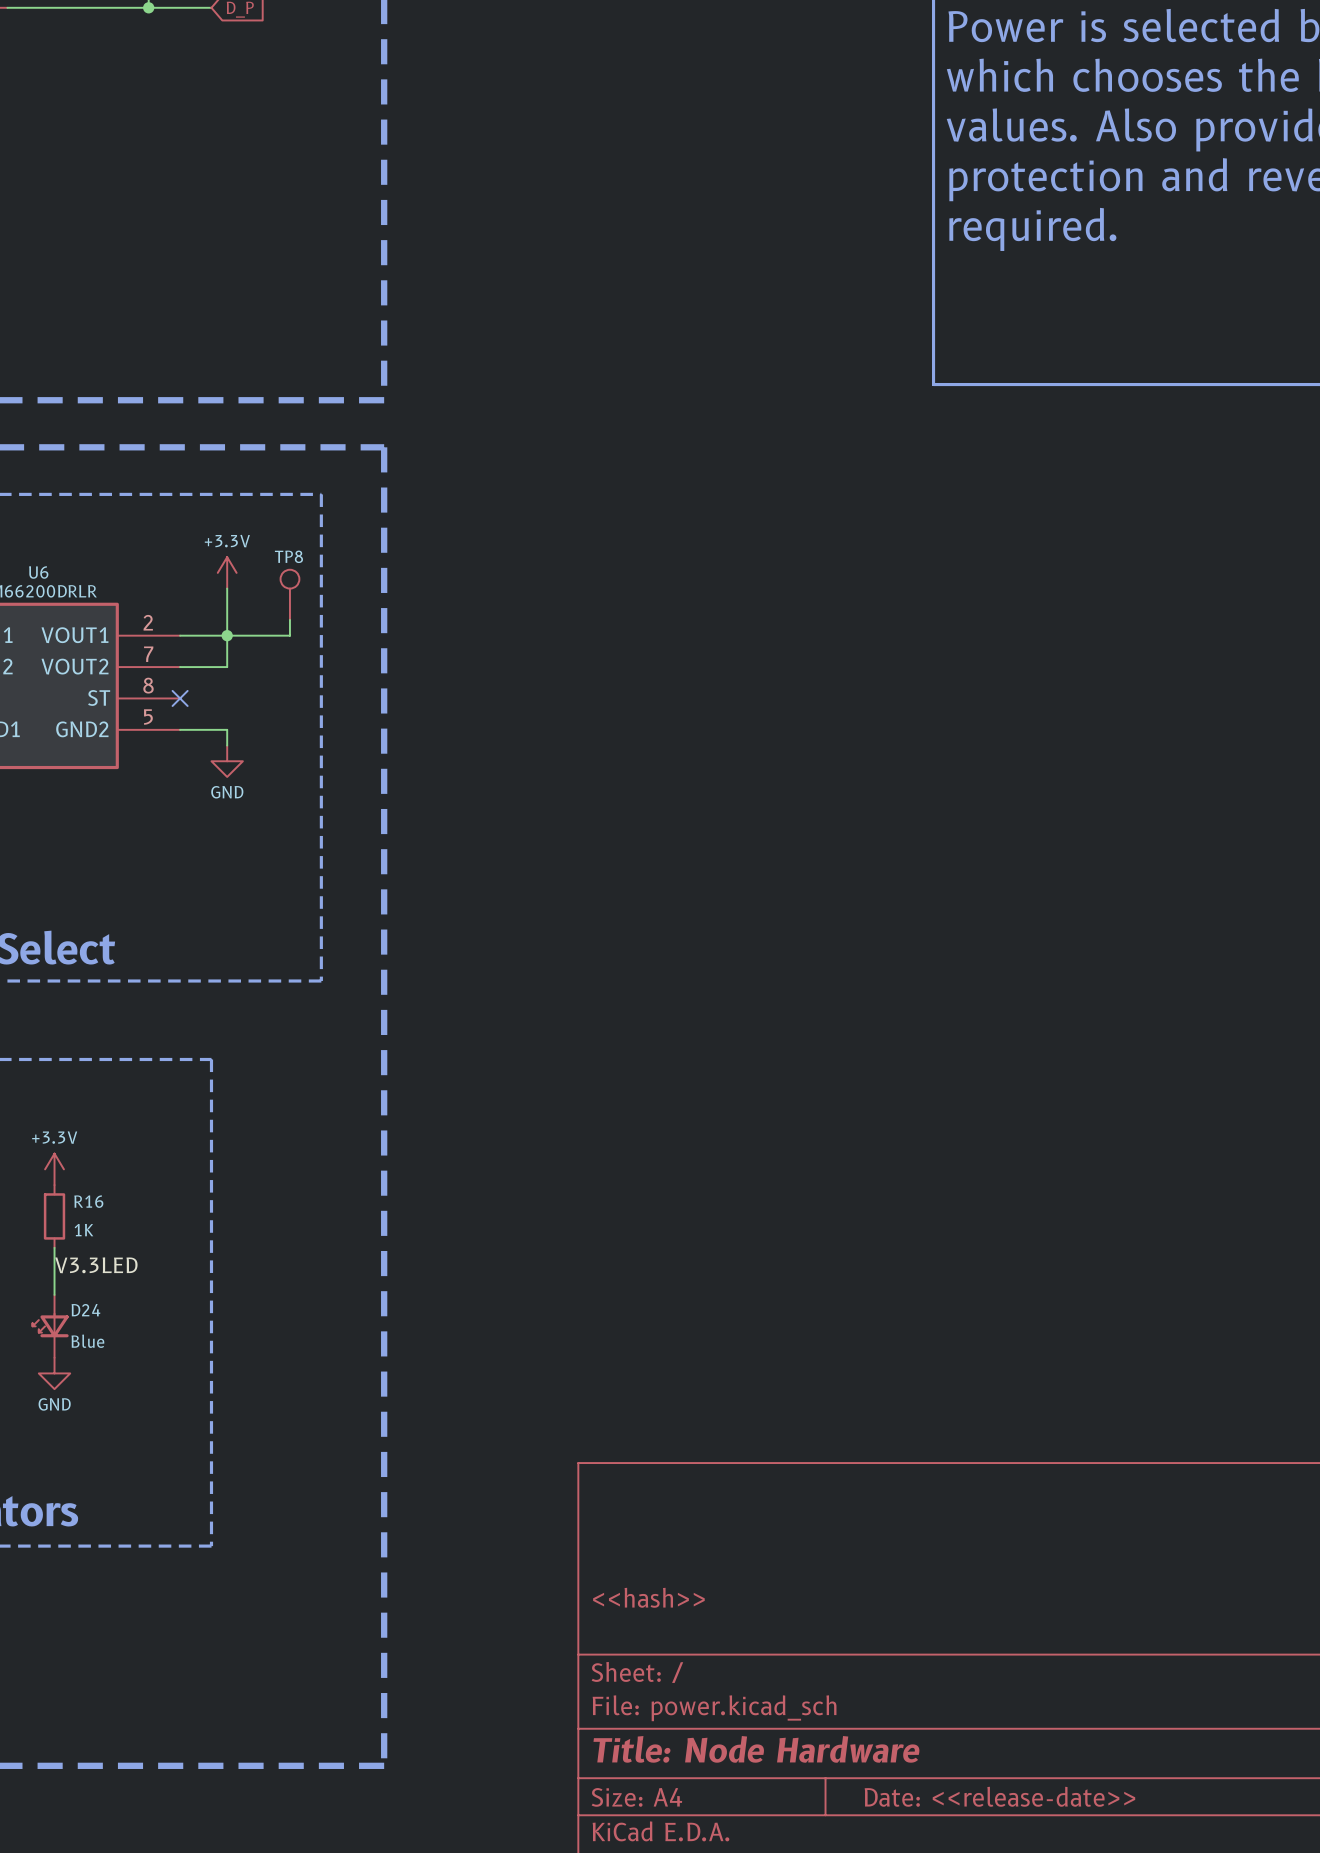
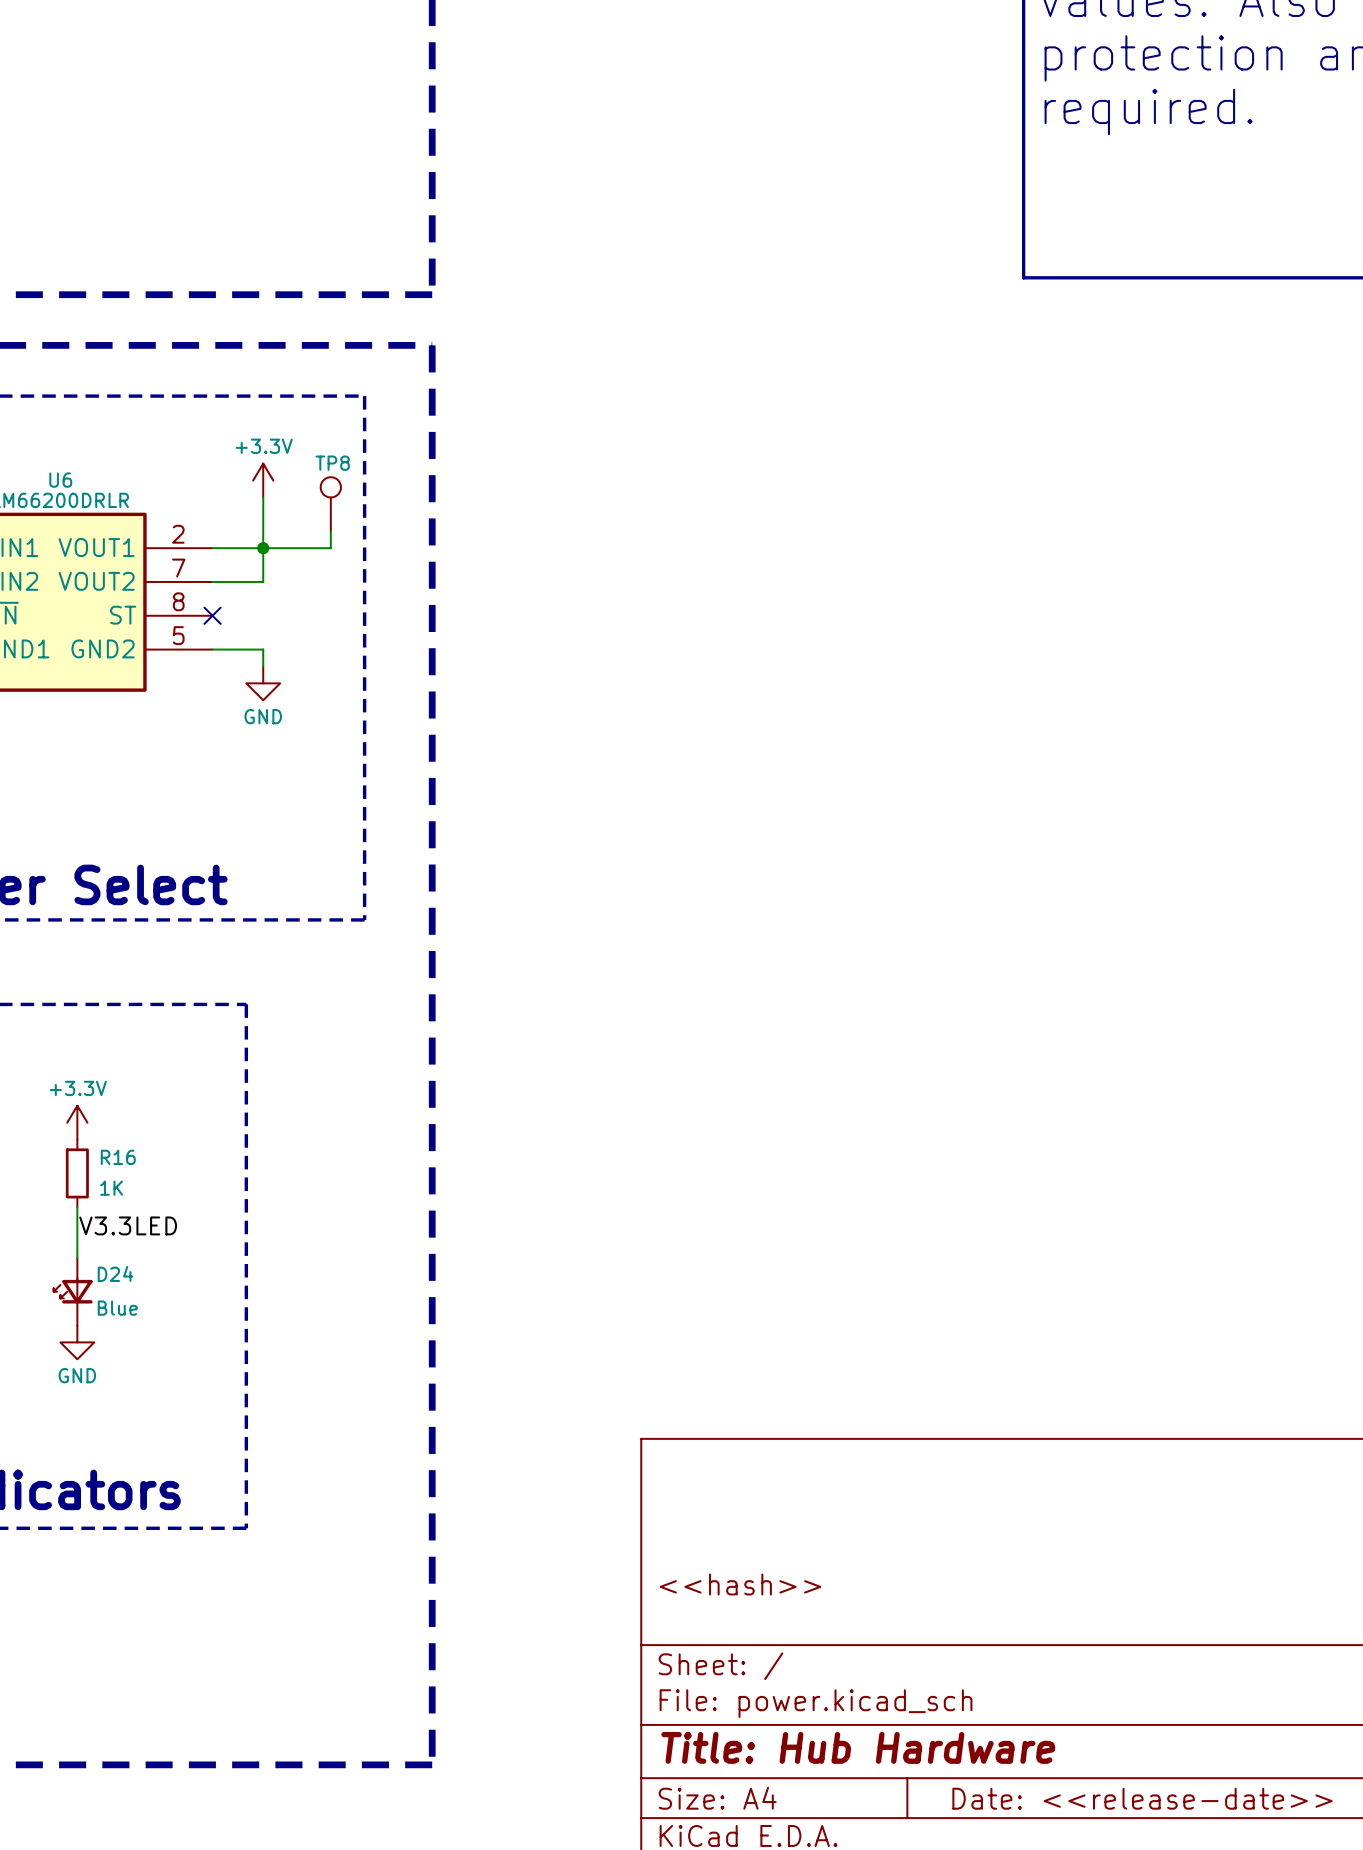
title block: Title: Node Hardware (756, 1749) -> Title: Hub Hardware (858, 1747)

